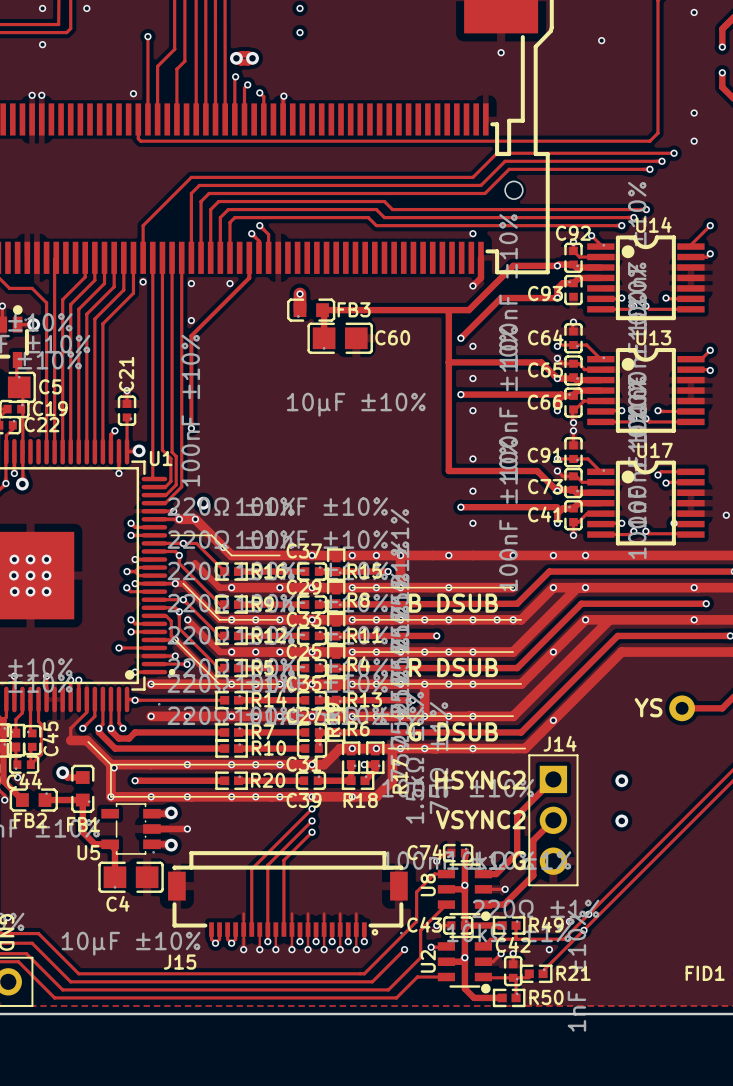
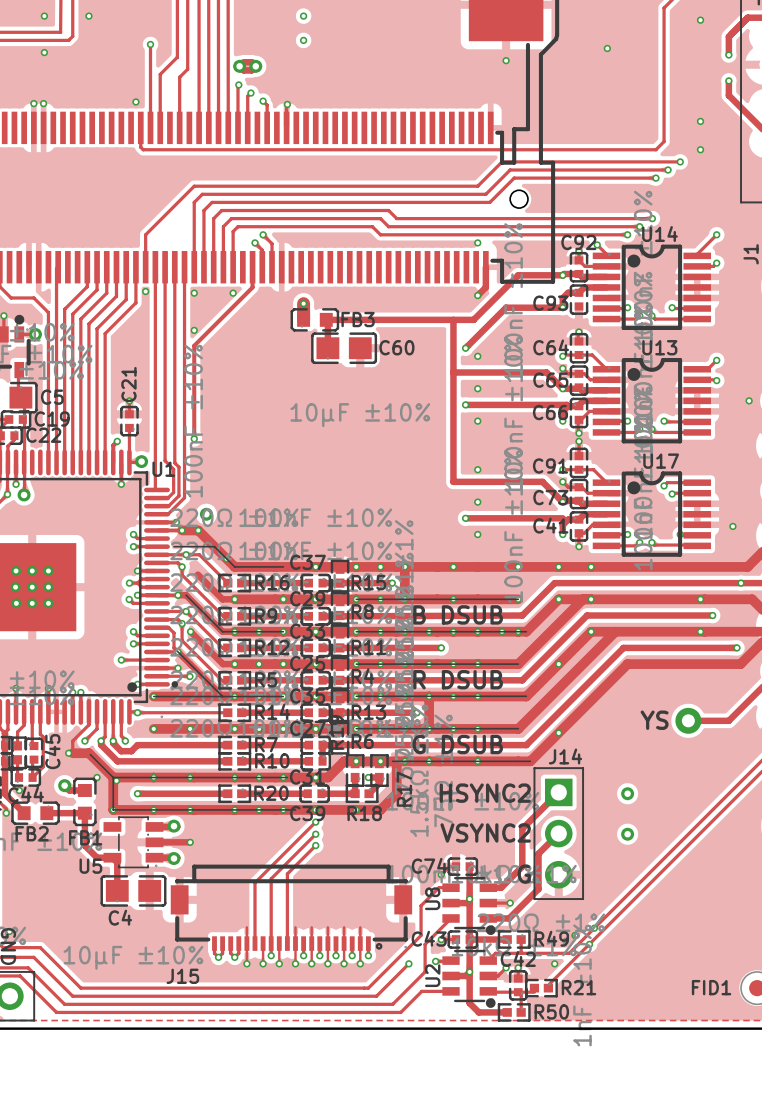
via: none -> (68, 753)
via: none -> (97, 777)
via: none -> (153, 777)

